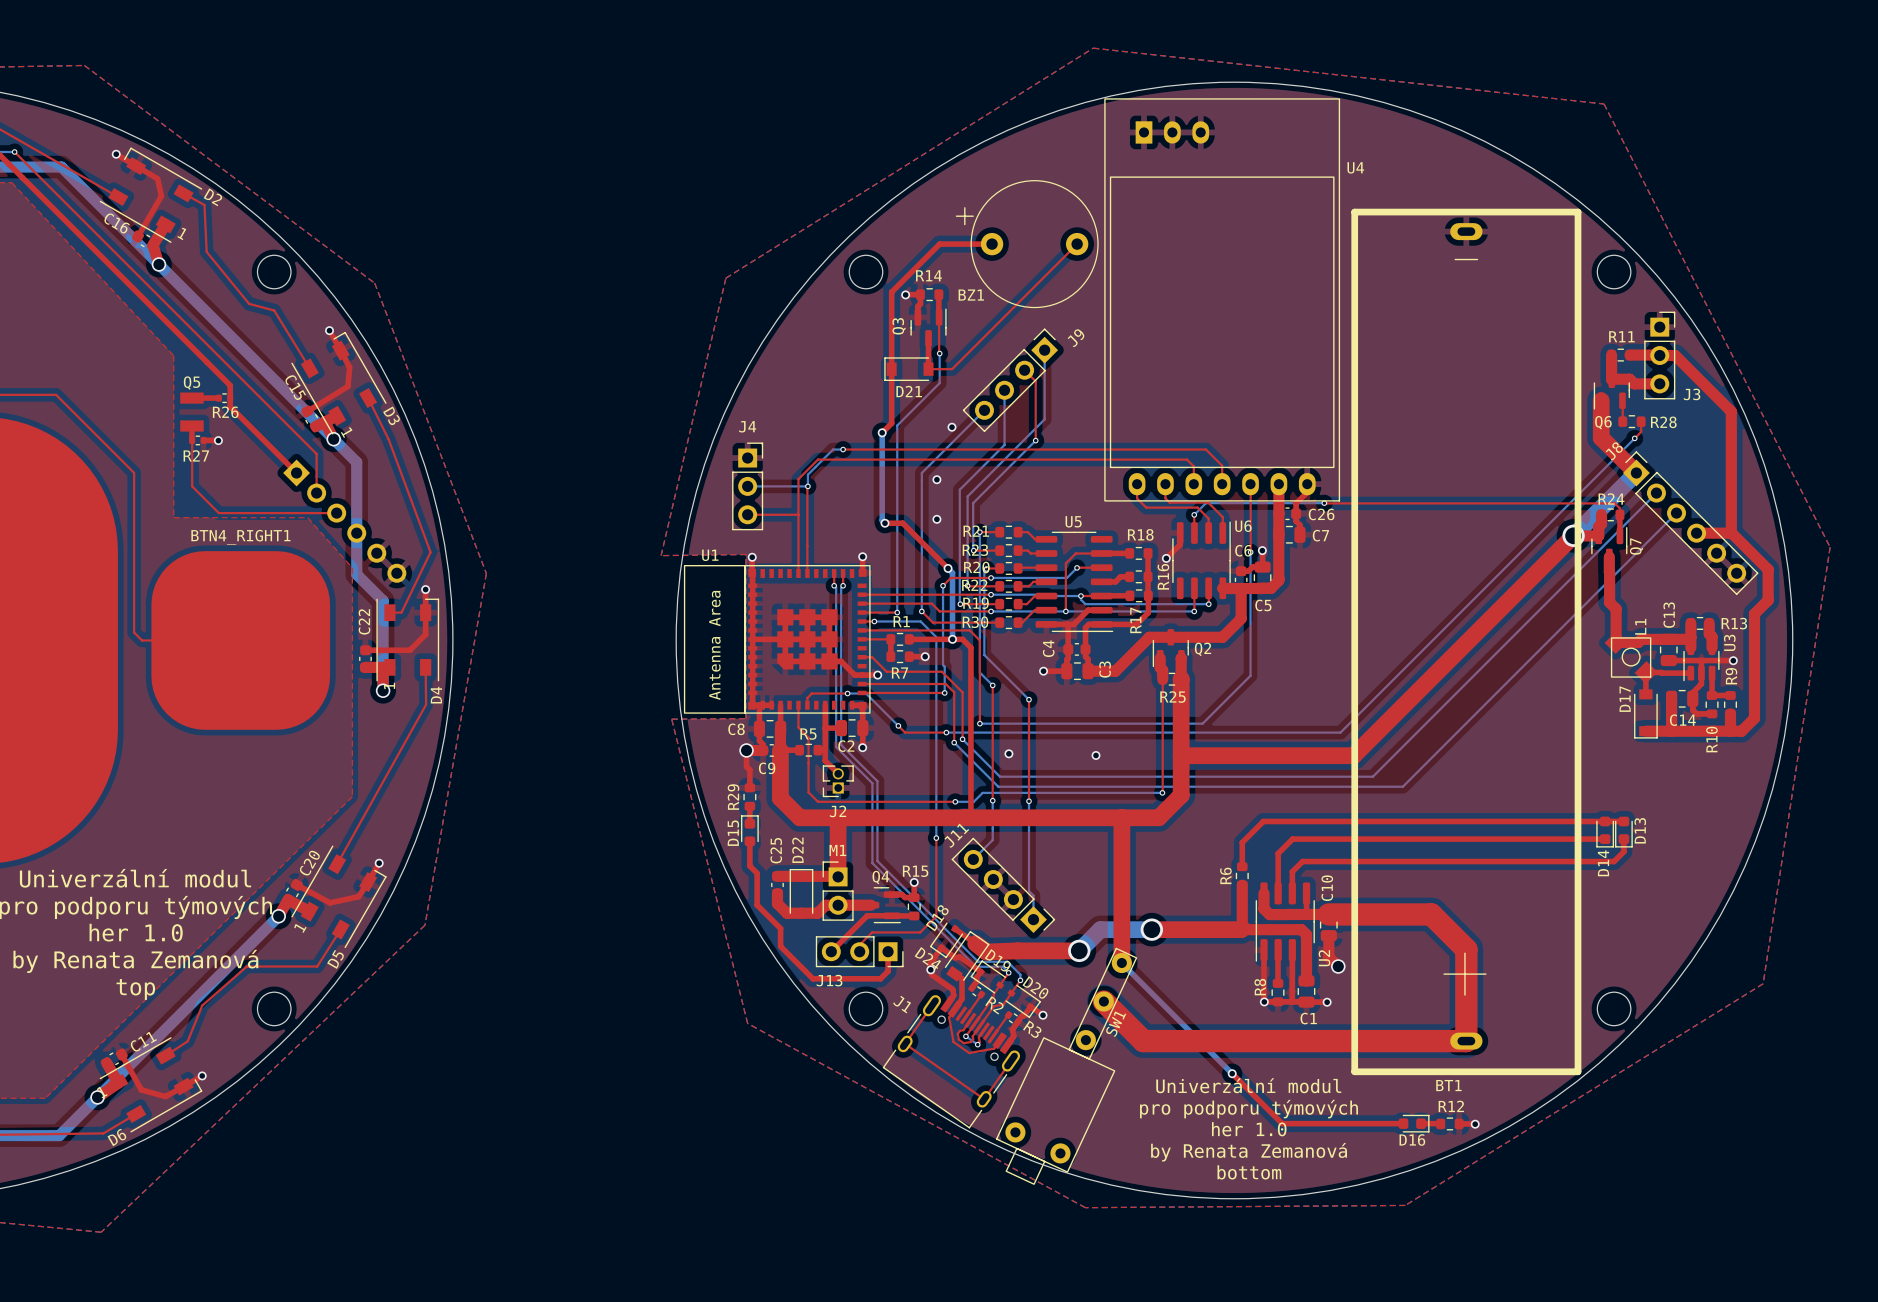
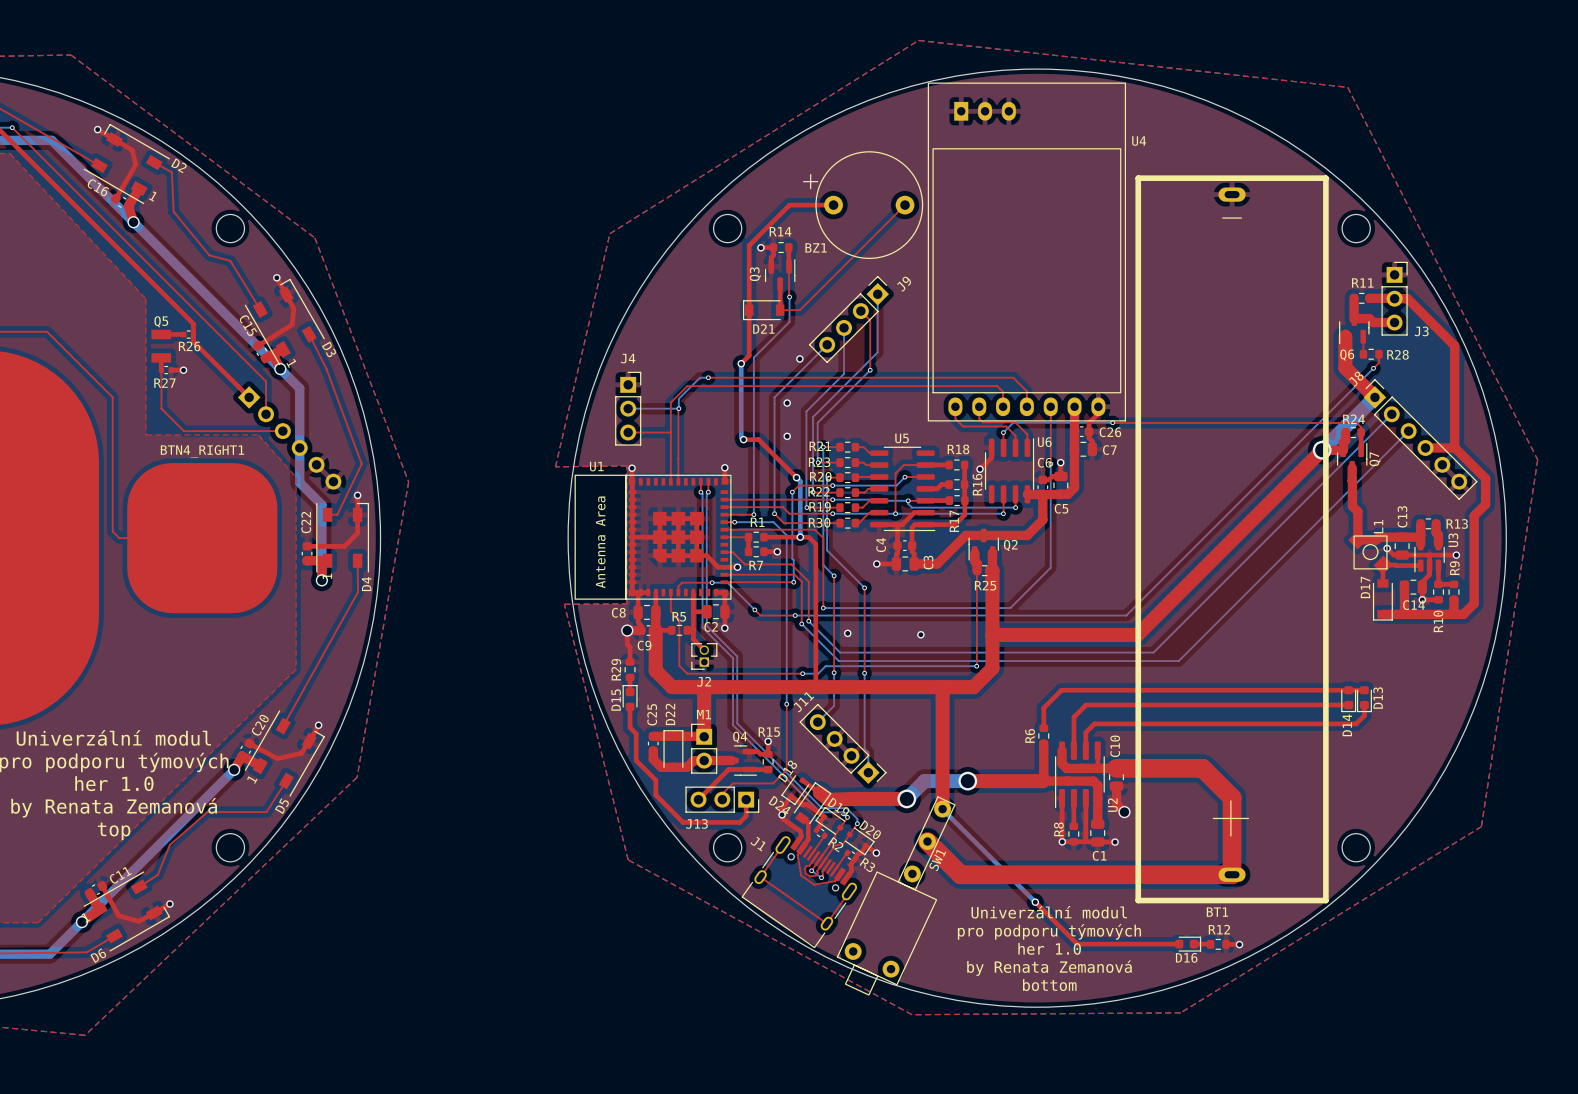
top track: none -> (1387, 548) (1393, 555) (1402, 555)
via: none -> (1387, 548)
via: none -> (1422, 599)

